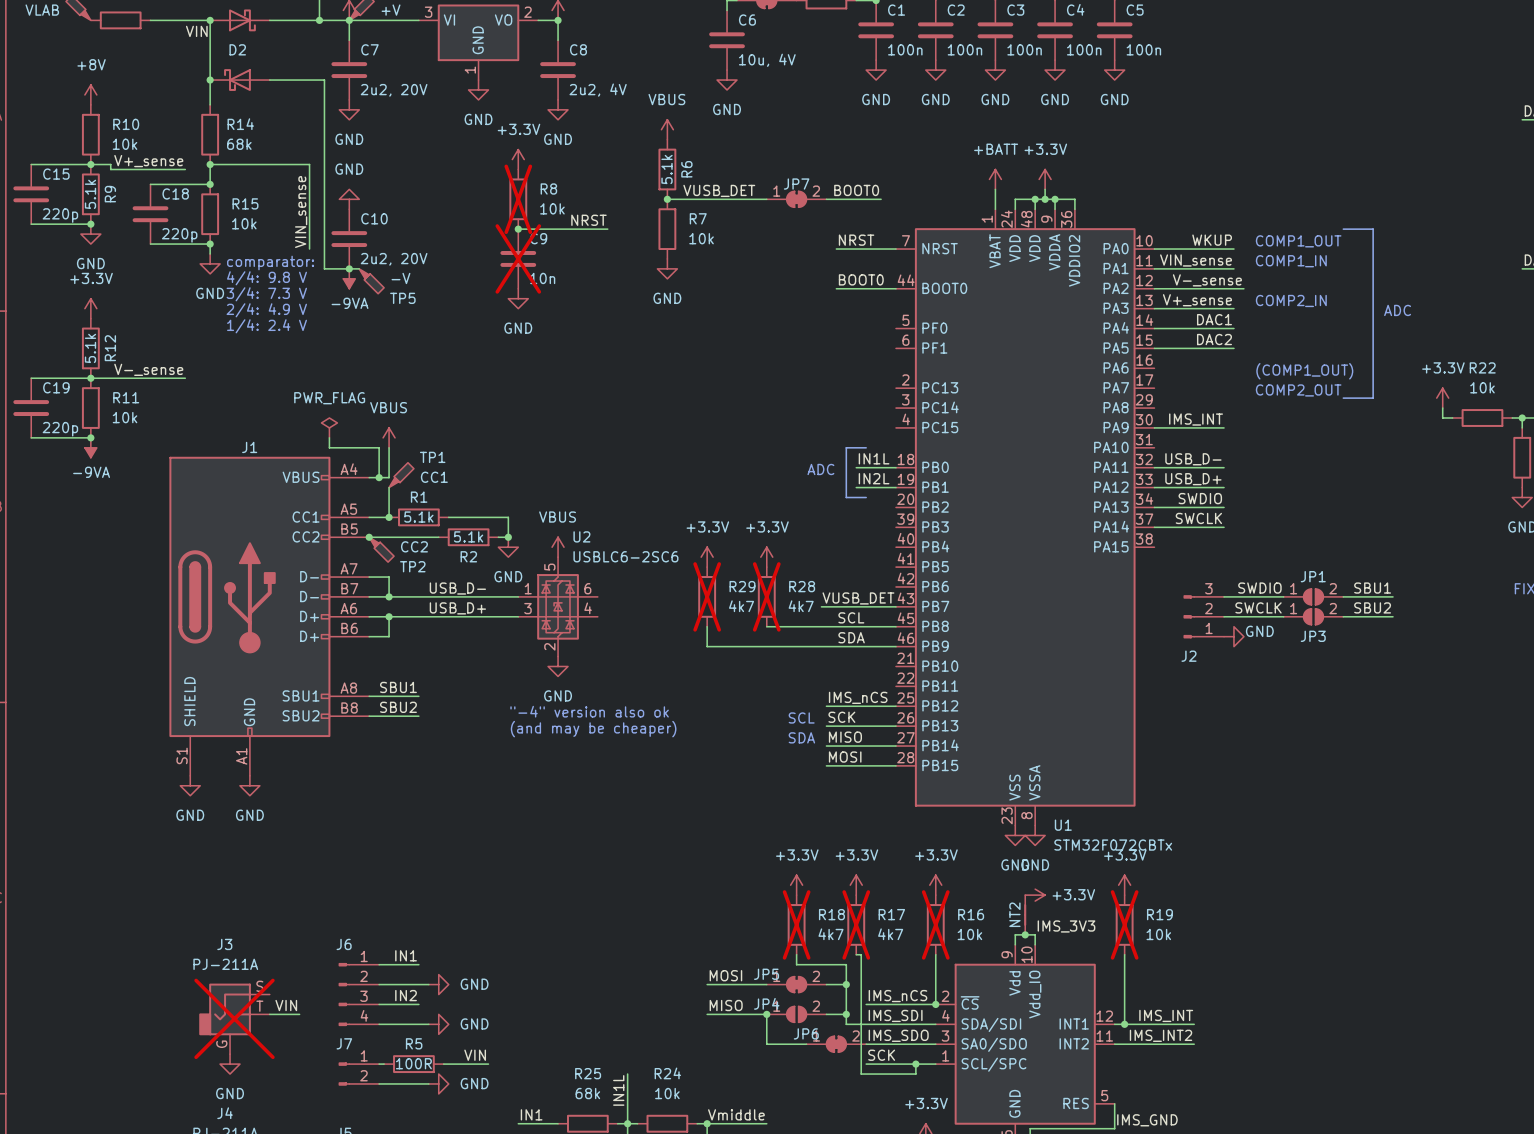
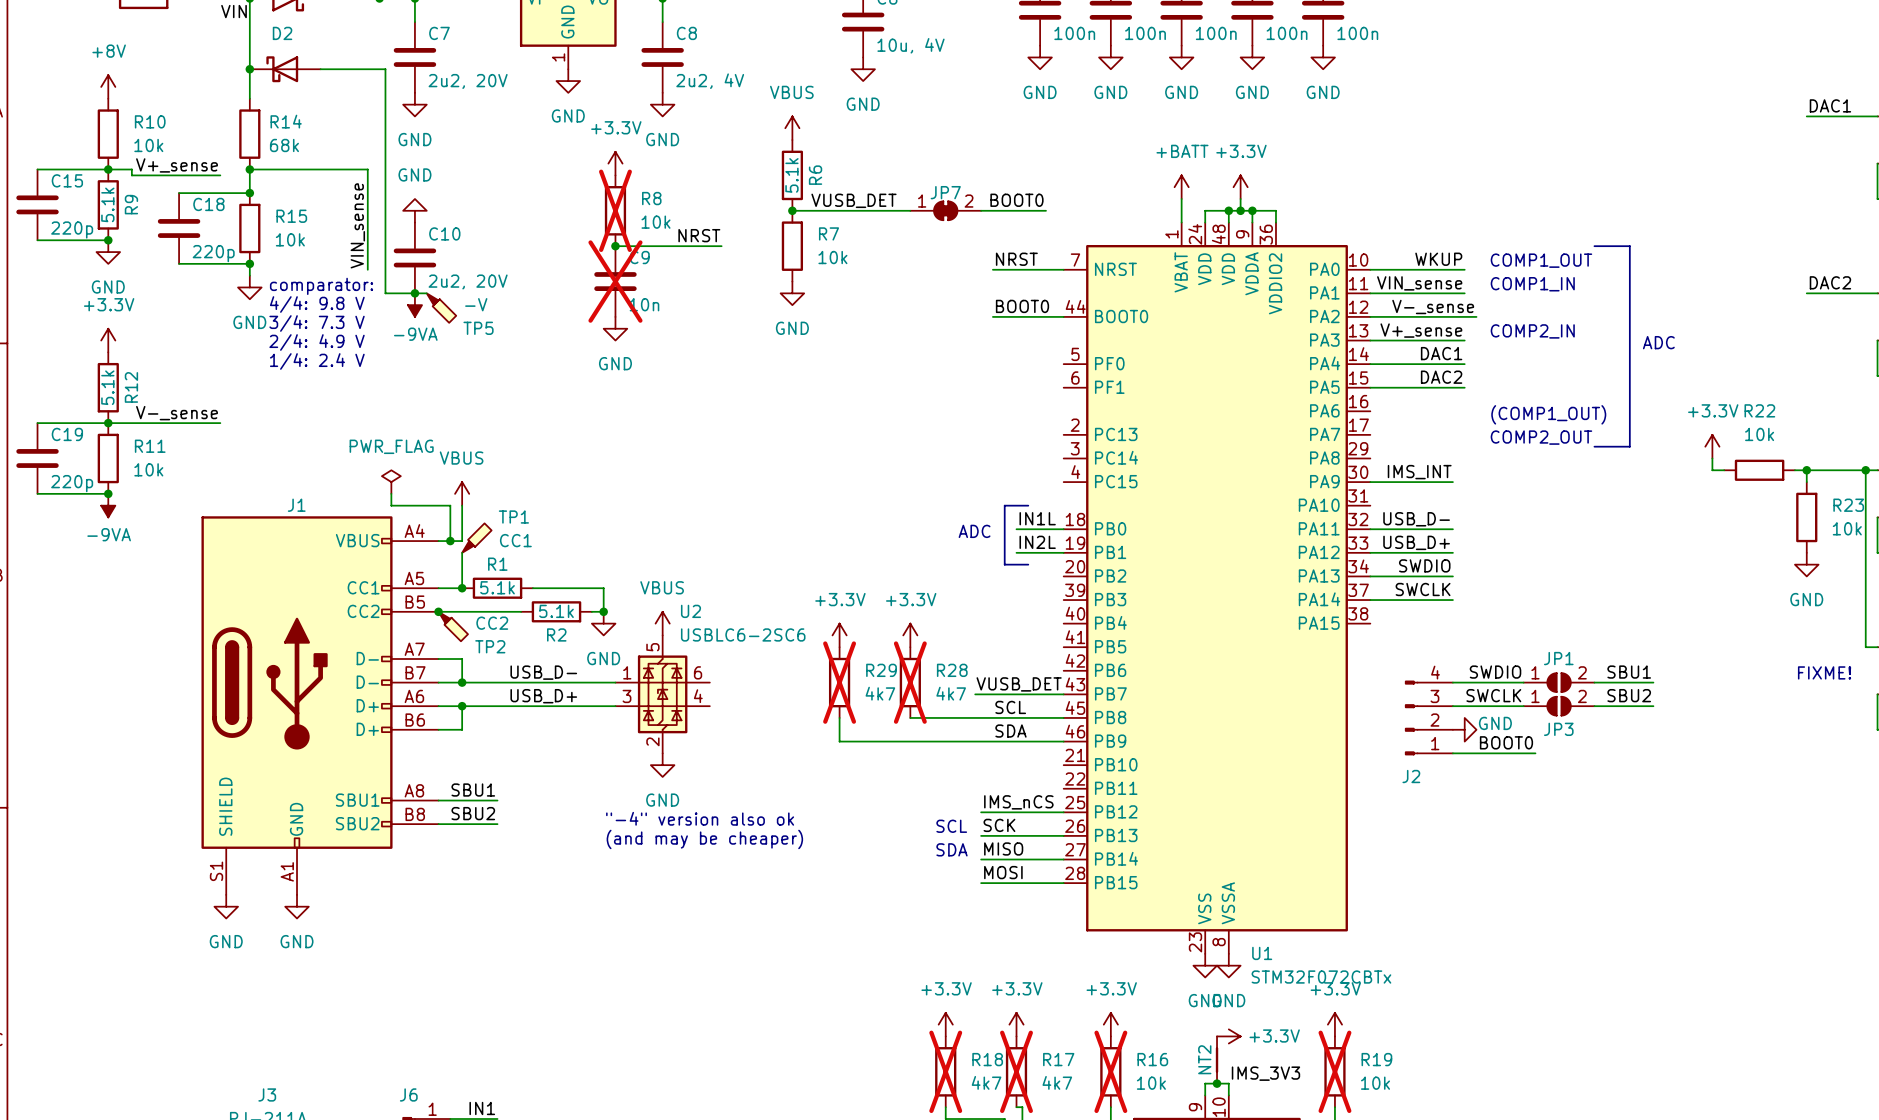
J2 symbol: [1183, 595, 1225, 639] -> [1405, 680, 1453, 756]
label: none -> BOOT0 (1506, 742)
wire: none -> (1452, 753) (1535, 753)

